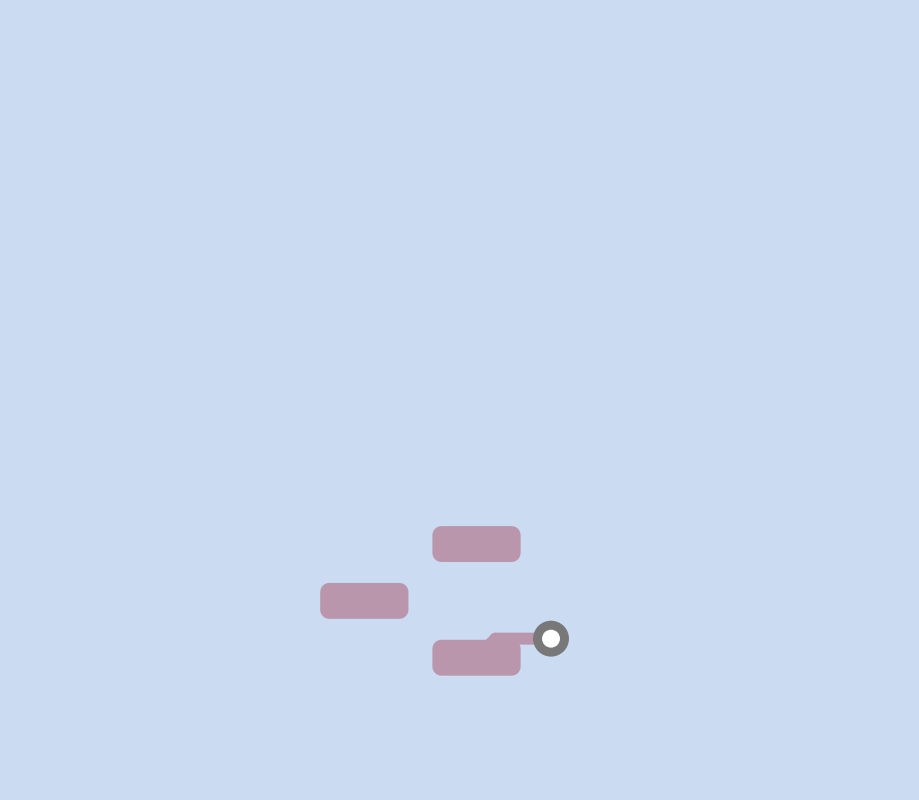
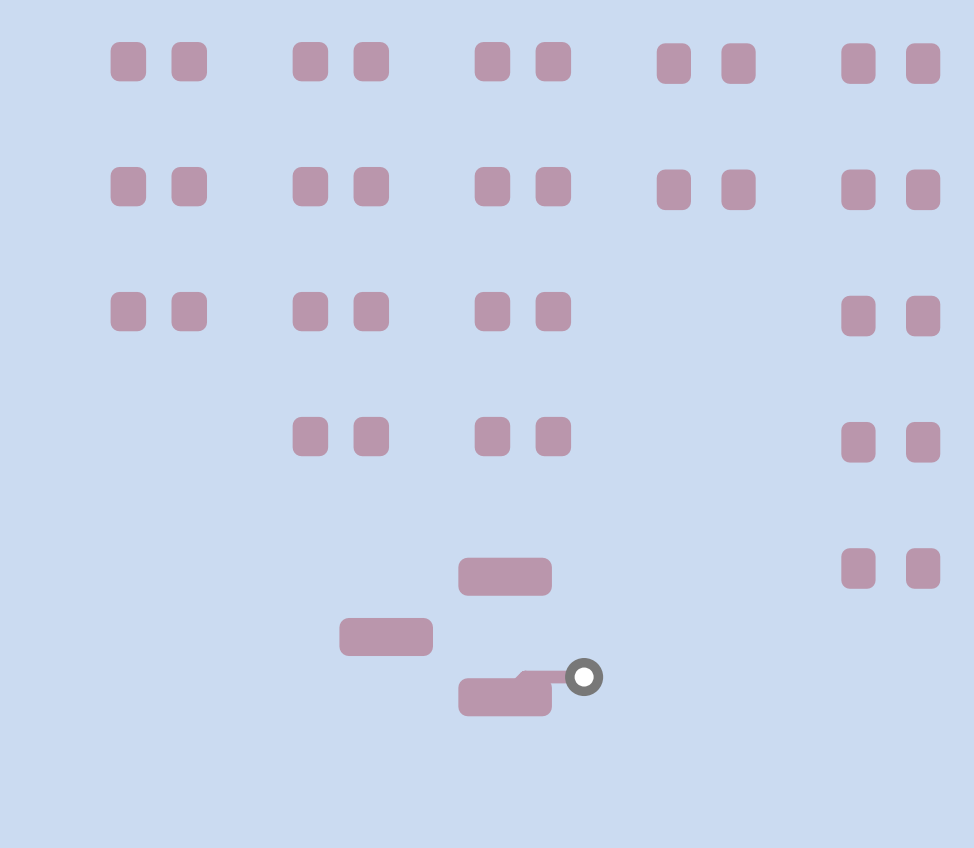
part: none -> (158, 61)
part: none -> (340, 61)
part: none -> (522, 61)
part: none -> (706, 63)
part: none -> (890, 63)
part: none -> (158, 186)
part: none -> (340, 186)
part: none -> (522, 186)
part: none -> (706, 189)
part: none -> (890, 189)
part: none -> (158, 311)
part: none -> (340, 311)
part: none -> (522, 311)
part: none -> (890, 316)
part: none -> (340, 436)
part: none -> (522, 436)
part: none -> (890, 442)
part: none -> (890, 568)

